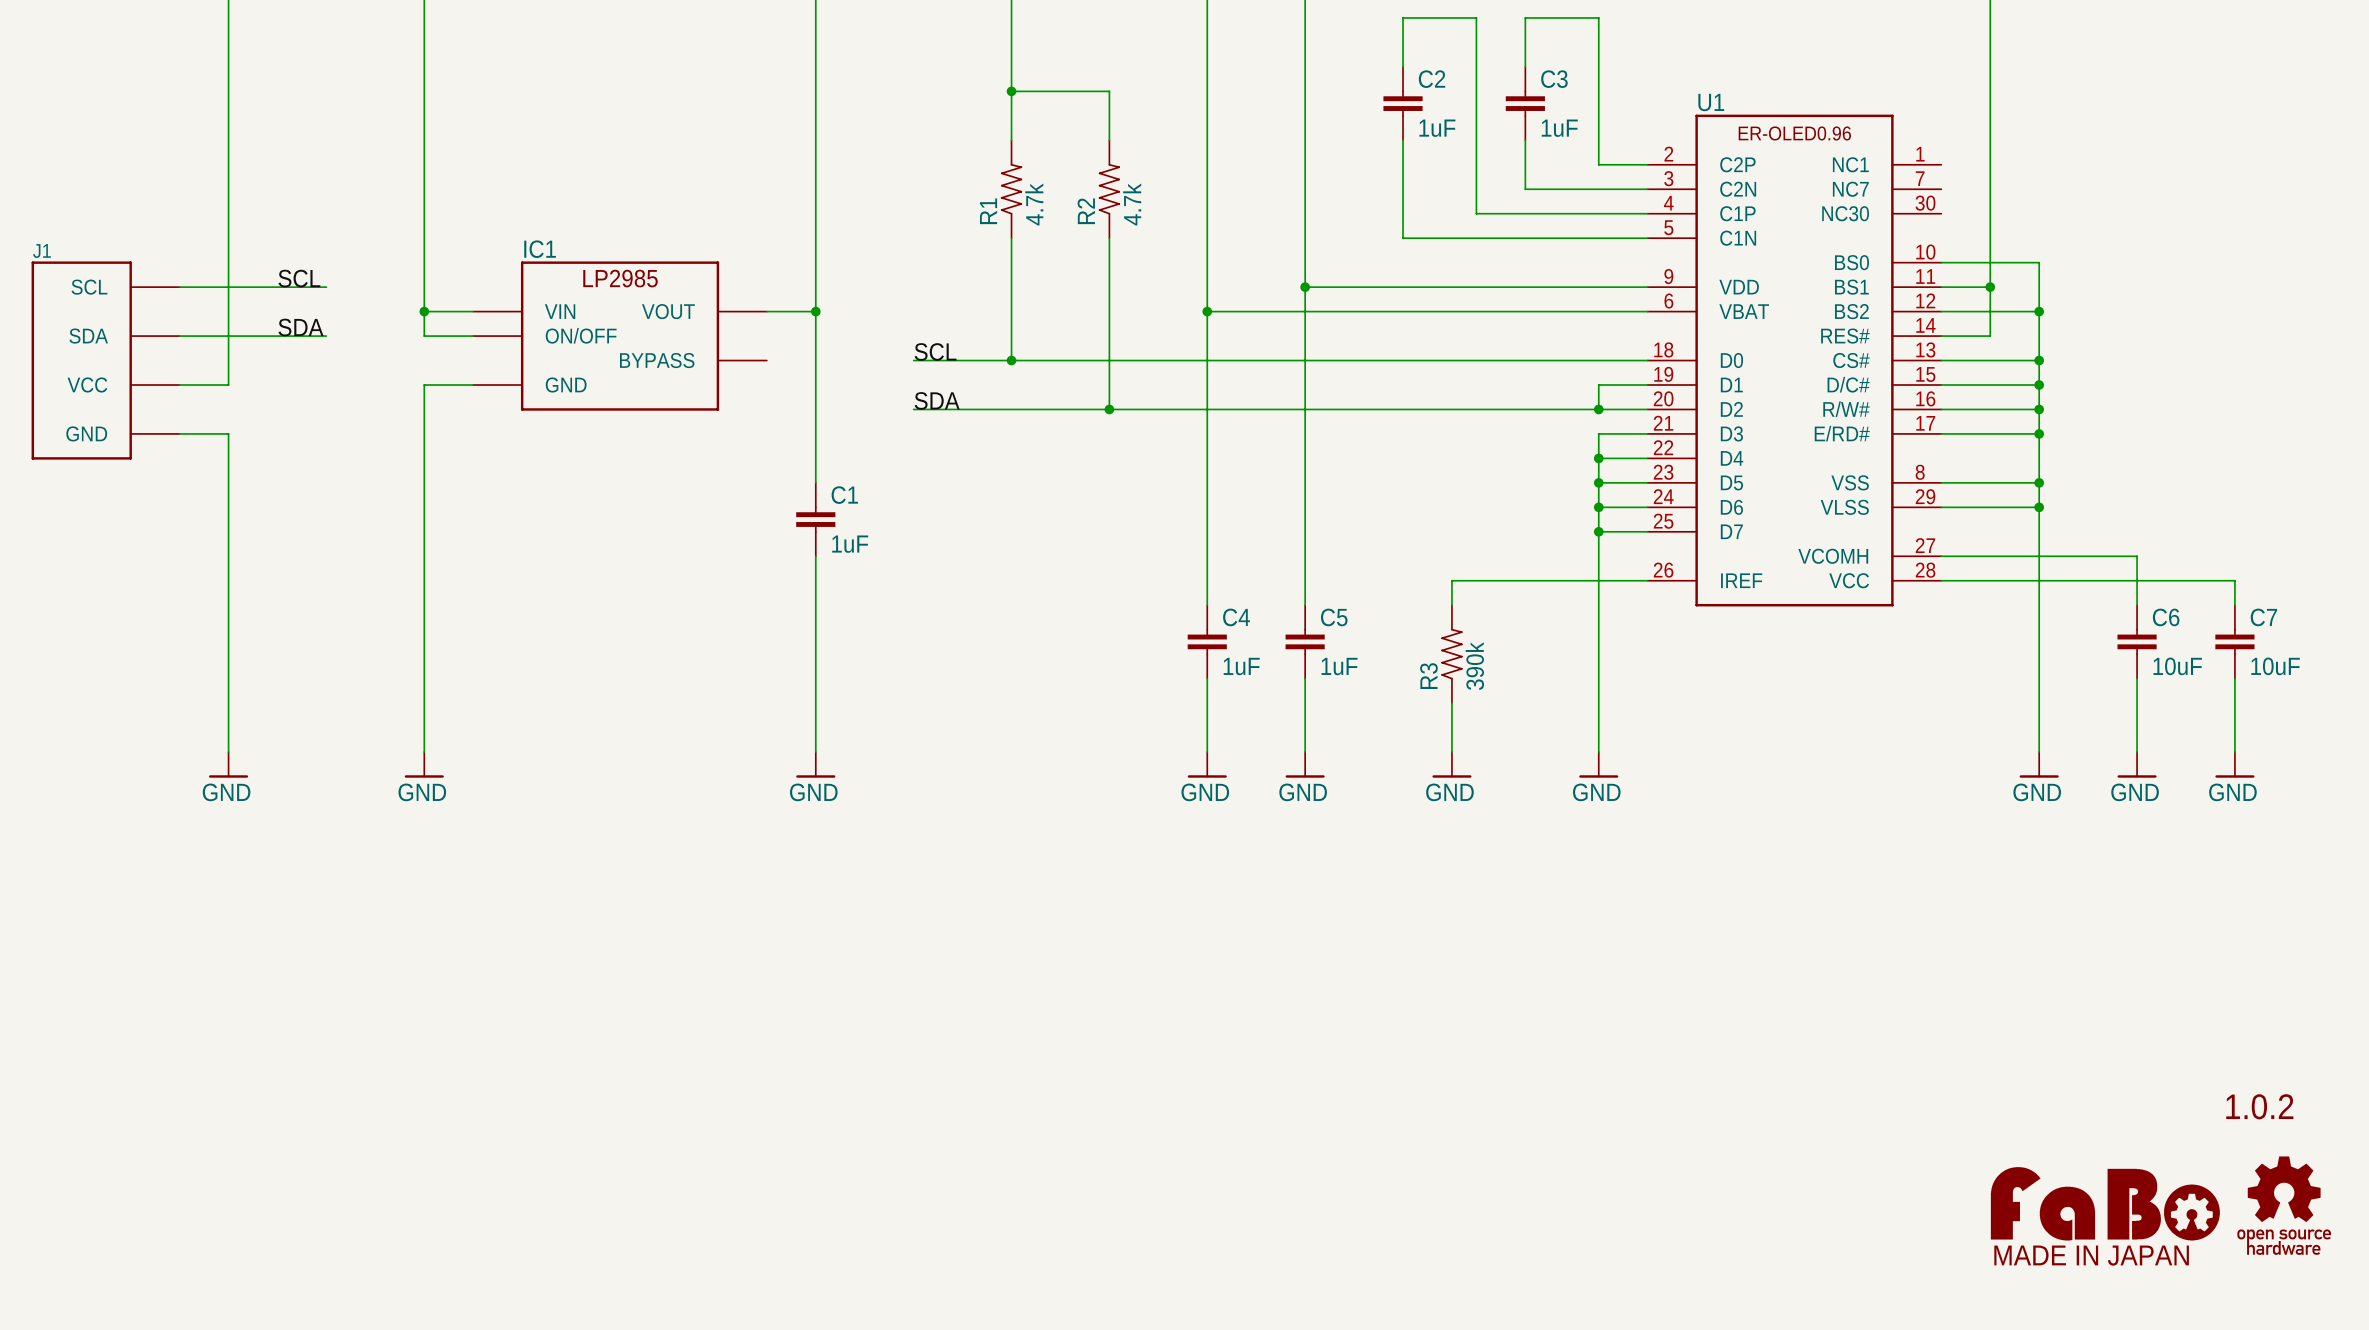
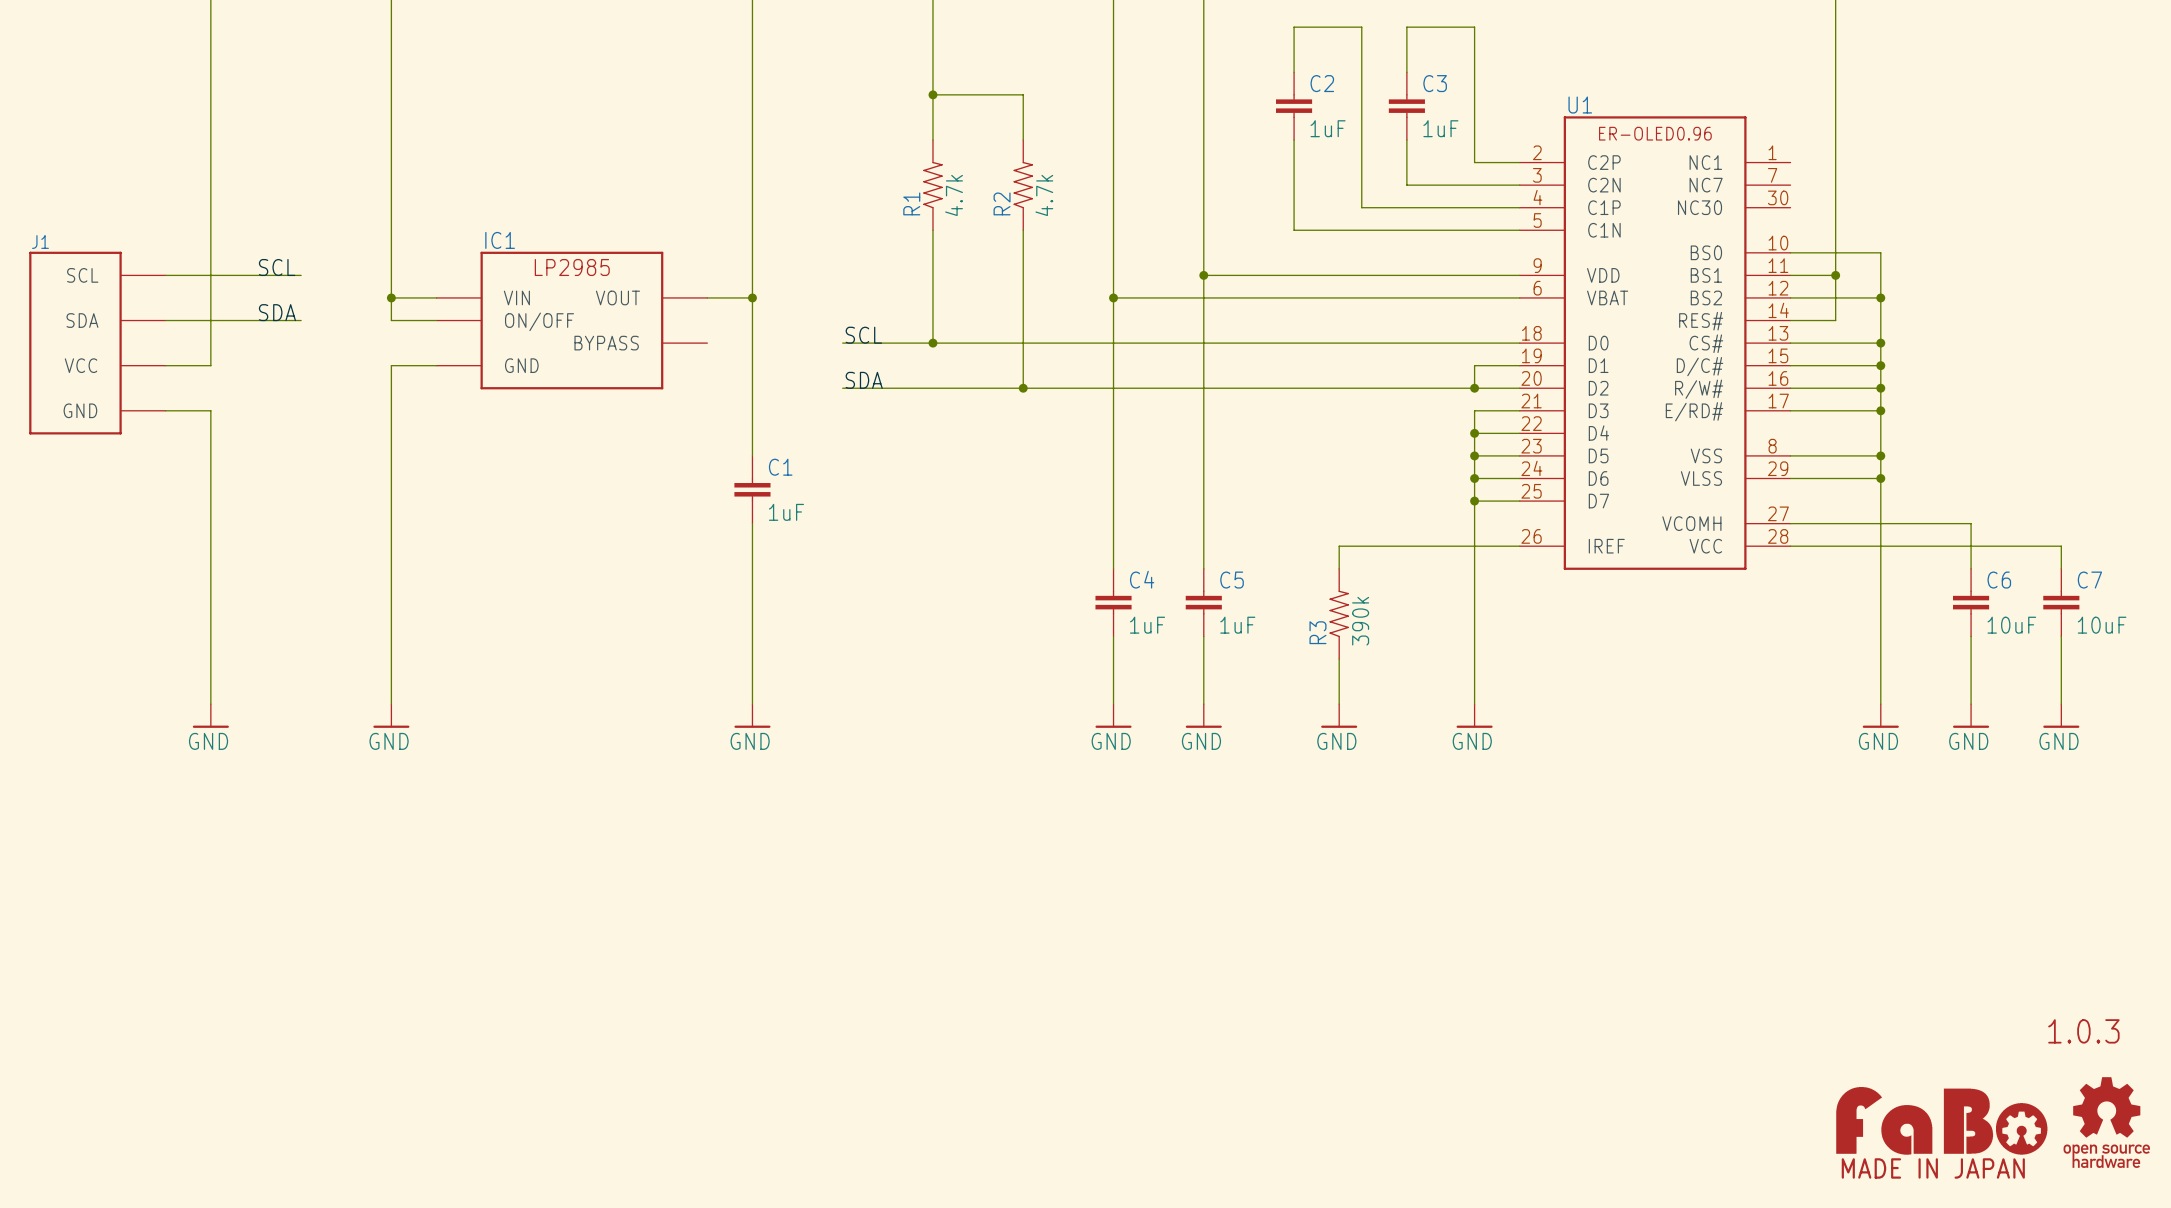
text: 1.0.2 (2259, 1106) -> 1.0.3 (2083, 1031)

